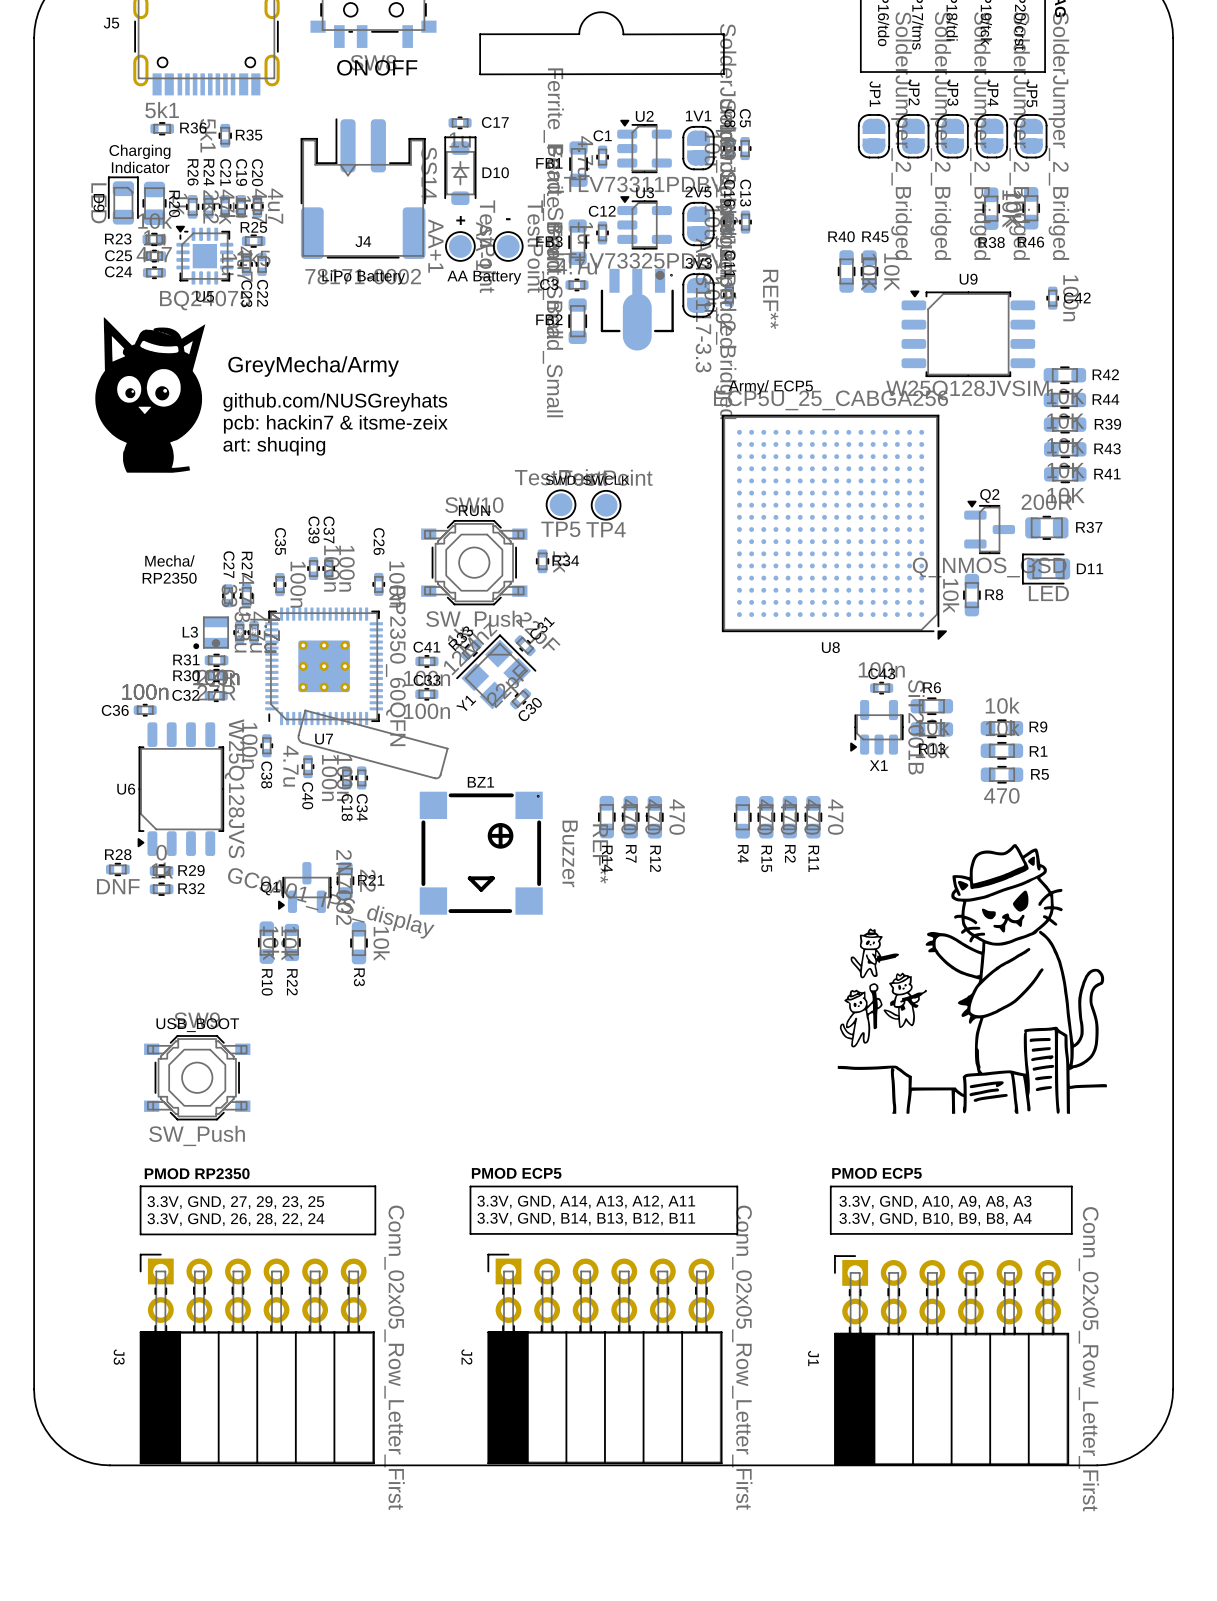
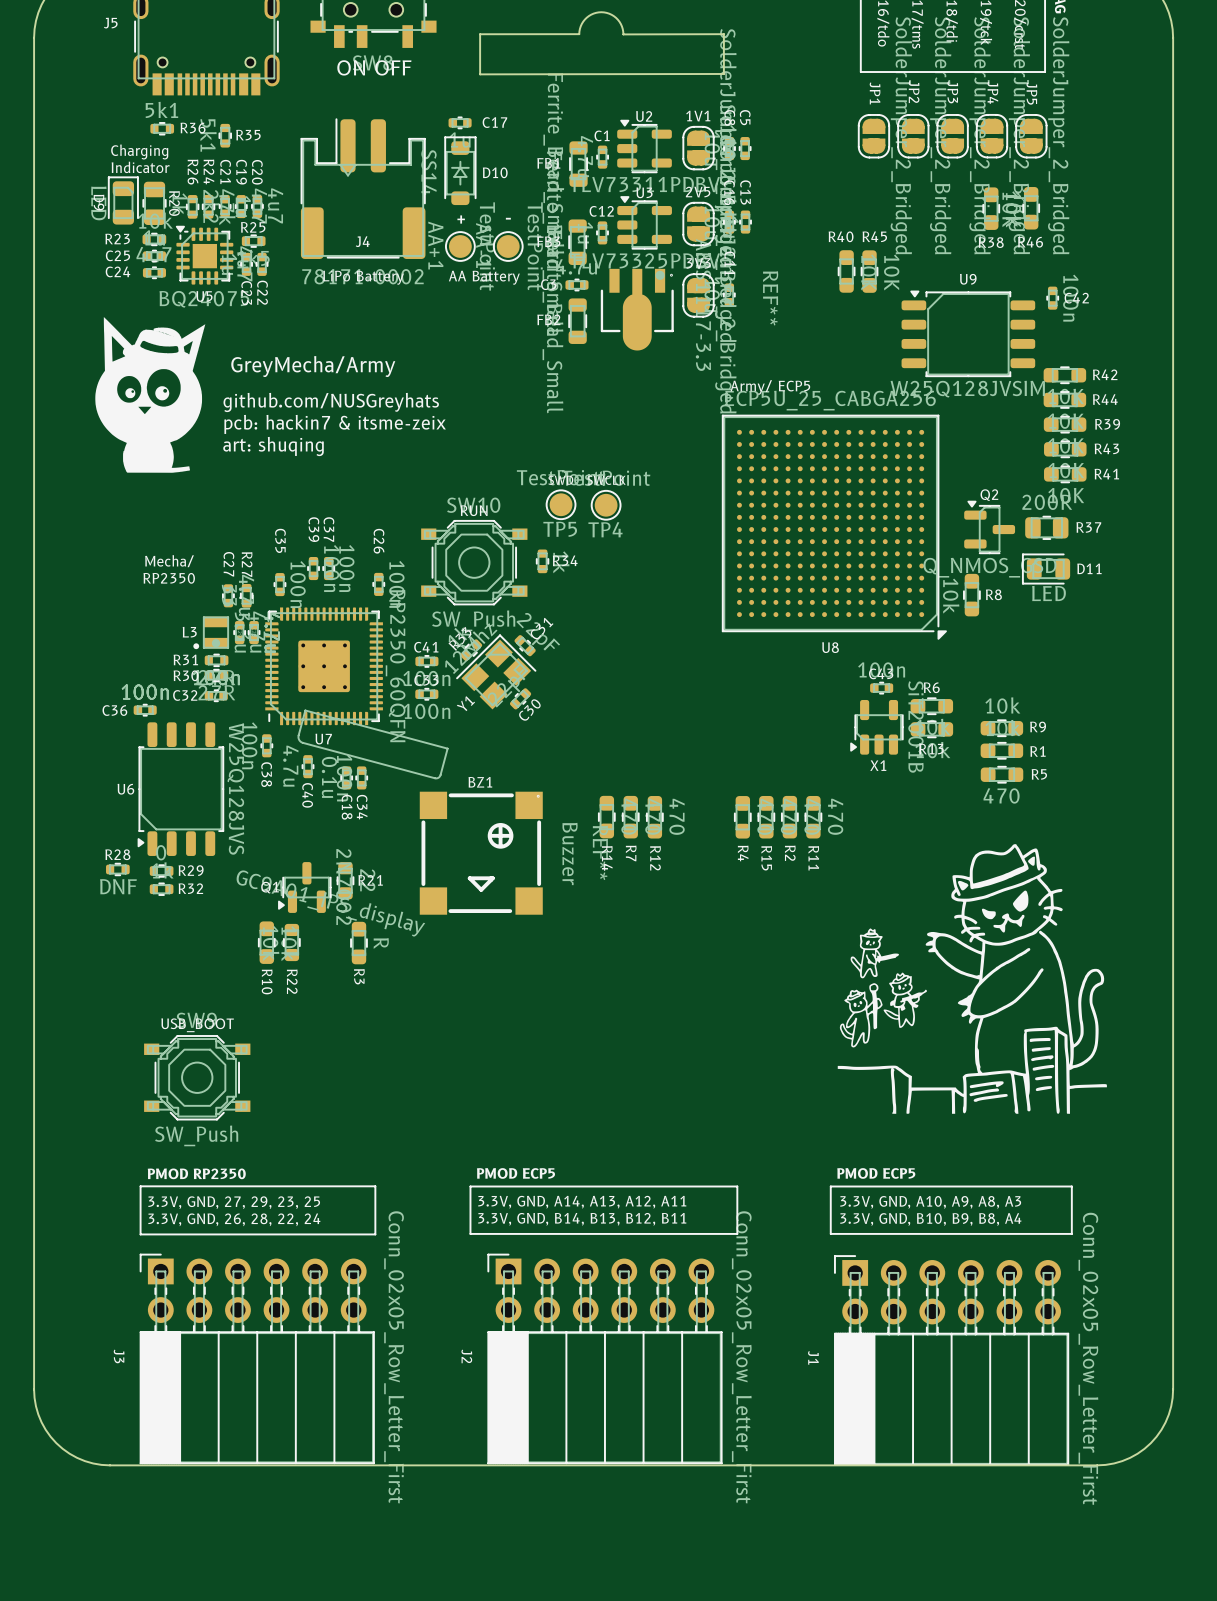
C18 value: 100n (329, 778) -> 0.1u (329, 777)
R3 value: 10k (381, 943) -> R (381, 943)

